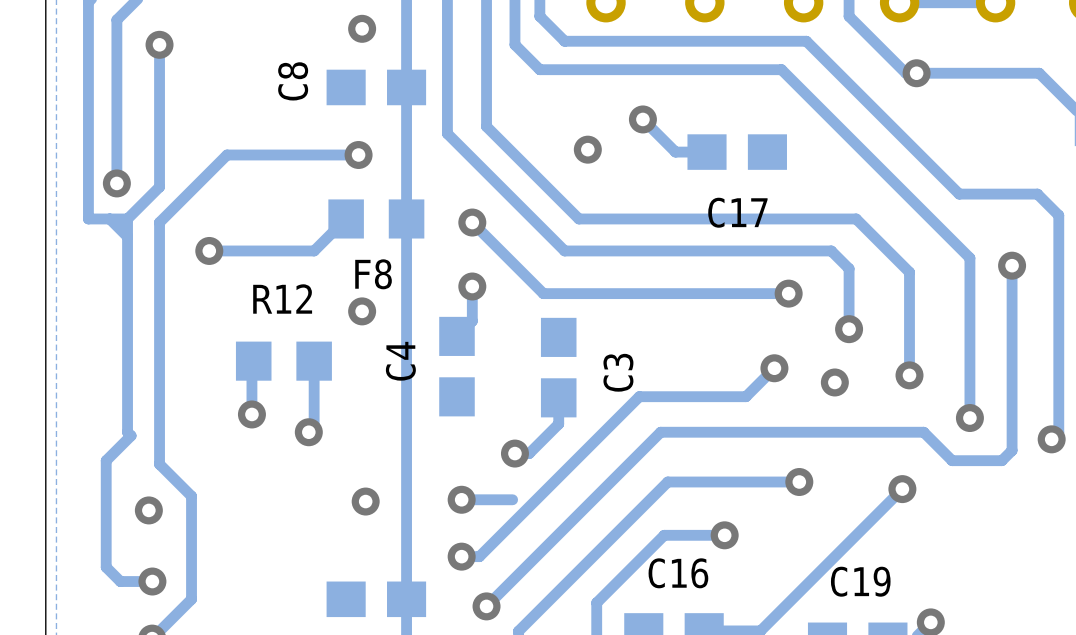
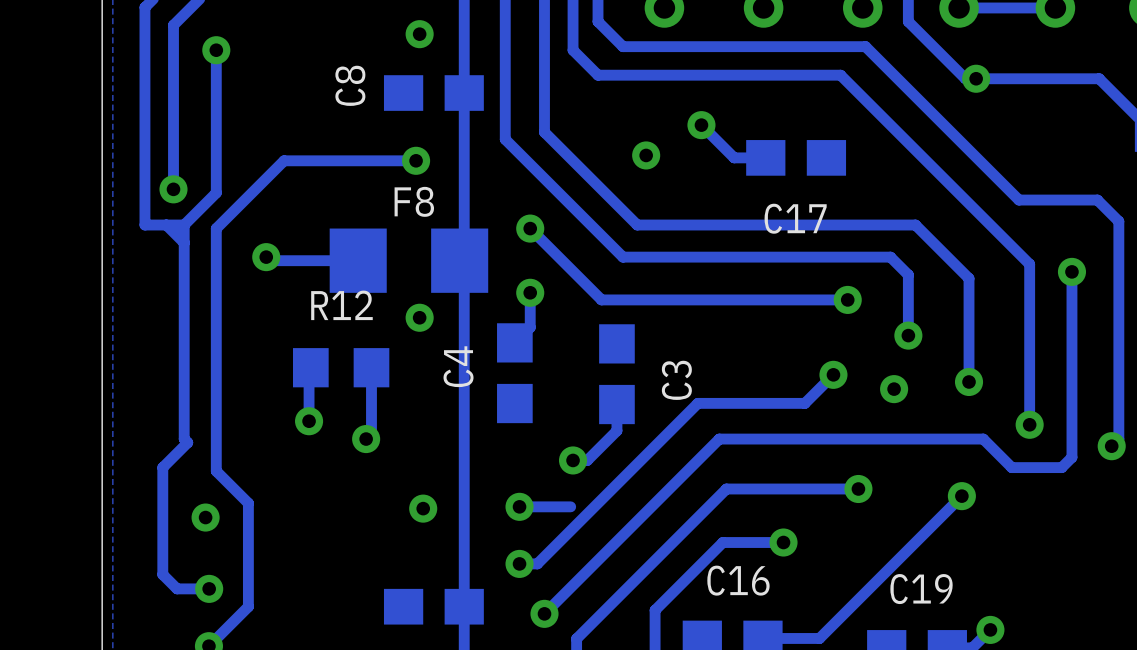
F8 footprint: [328, 199, 425, 239] -> [329, 228, 489, 293]
track: (346, 218) (314, 250) (209, 250) -> (358, 260) (269, 260) (266, 257)
F8 name position: F8 (373, 274) -> F8 (414, 201)

